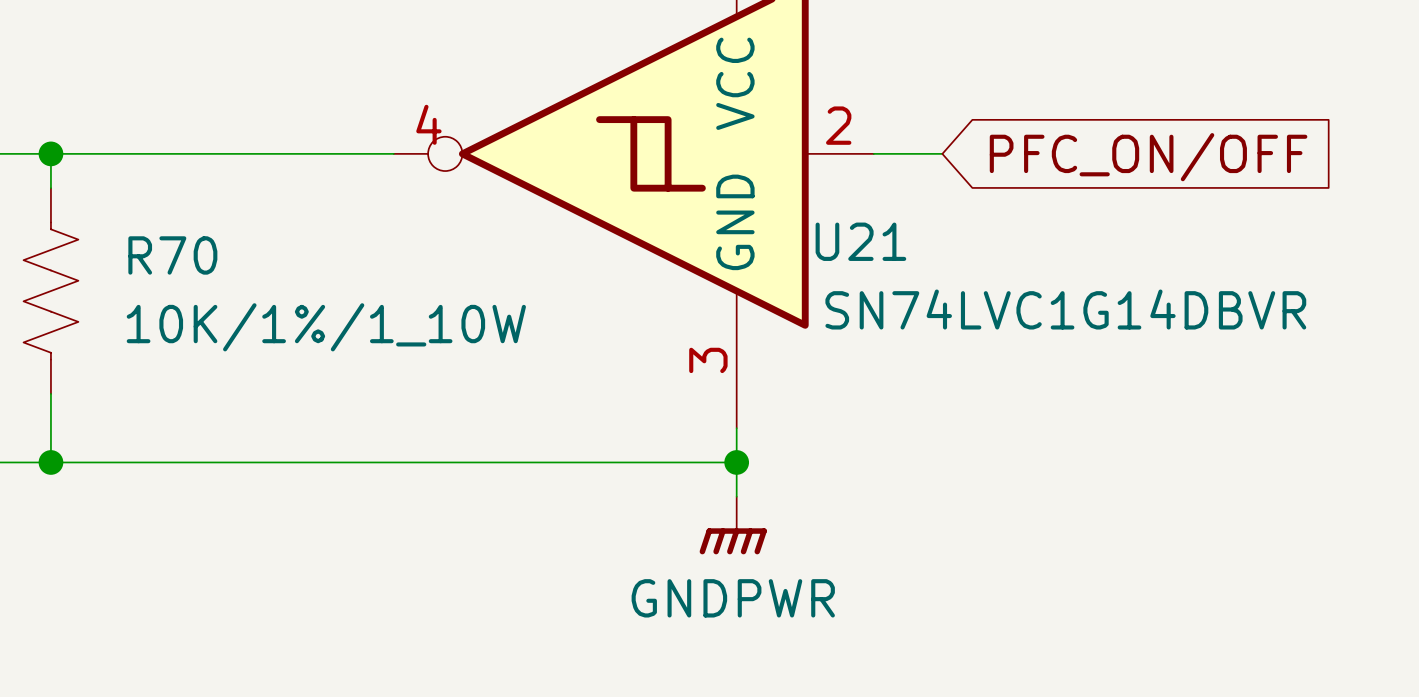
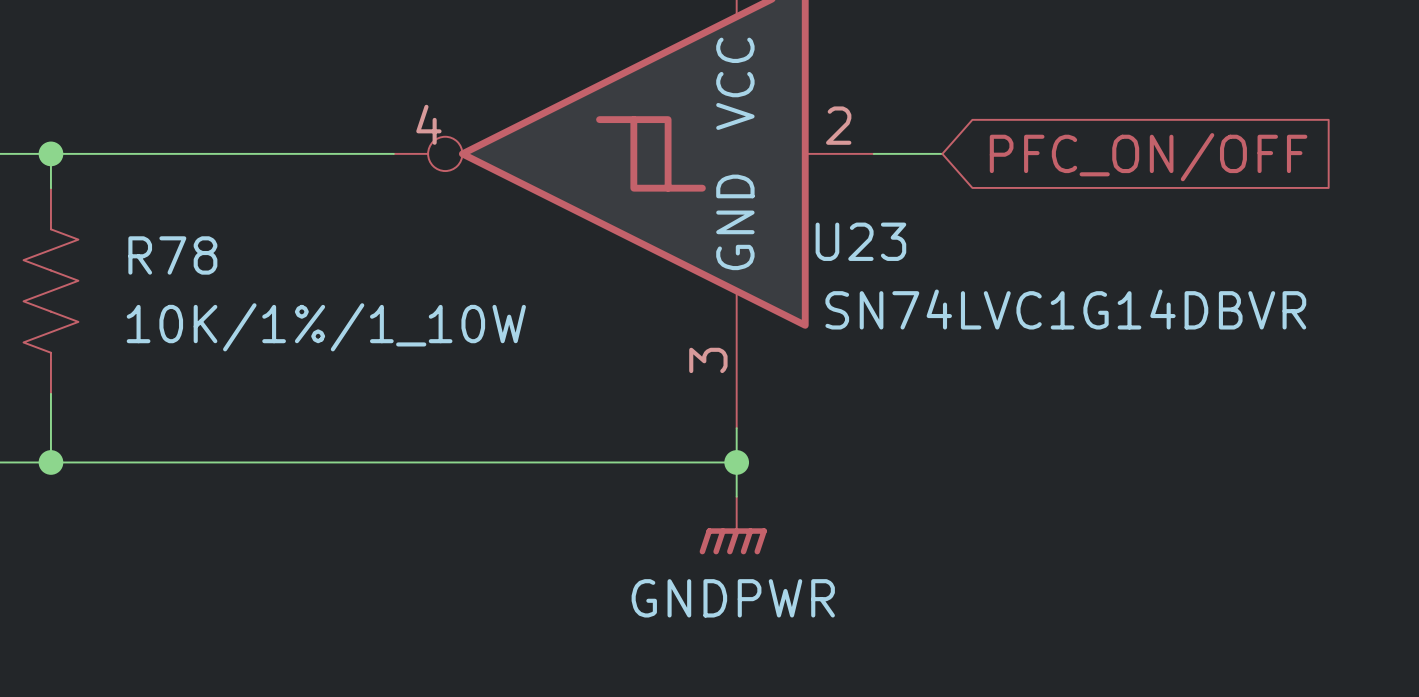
U21 name: U21 (860, 241) -> U23 (860, 241)
R70 name: R70 (172, 255) -> R78 (172, 255)

